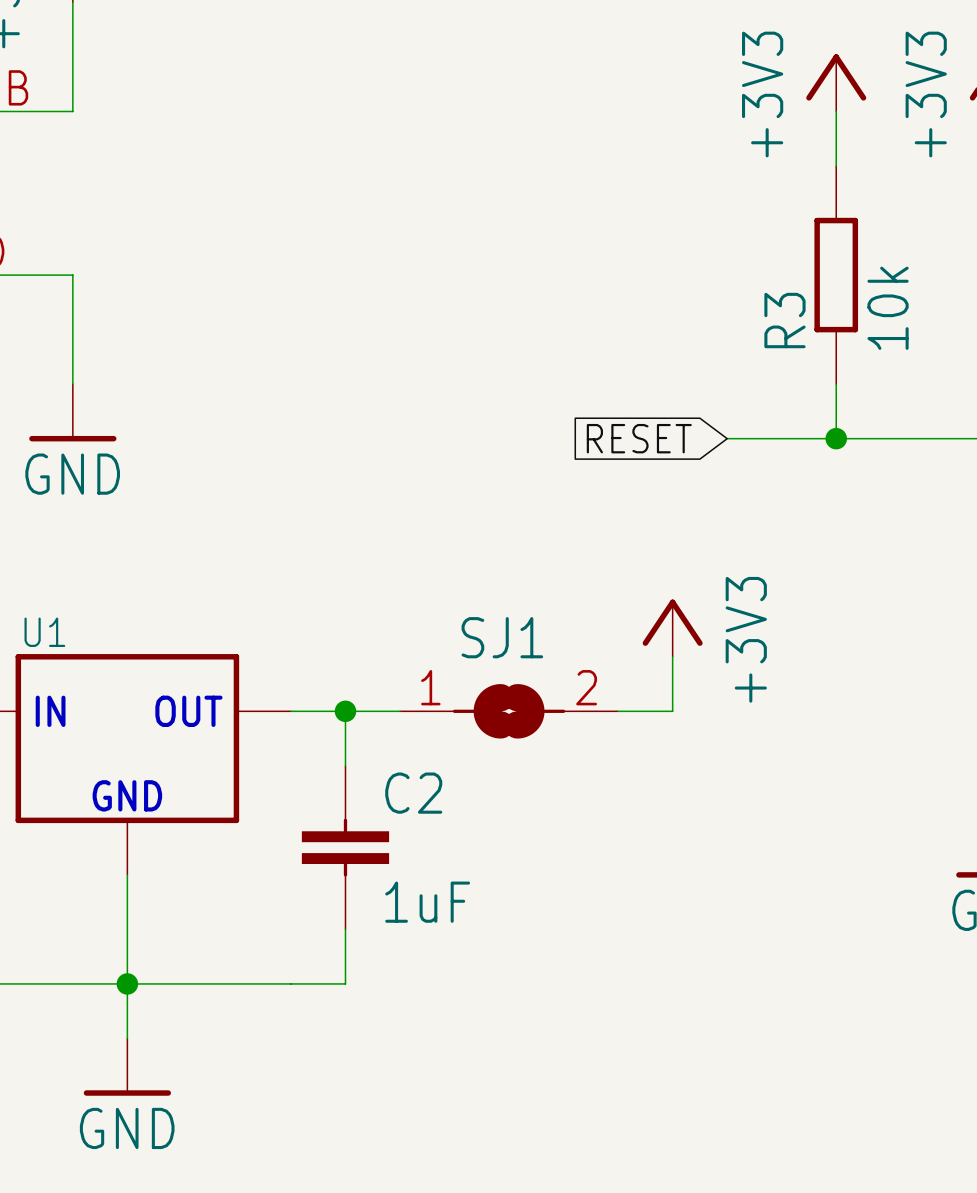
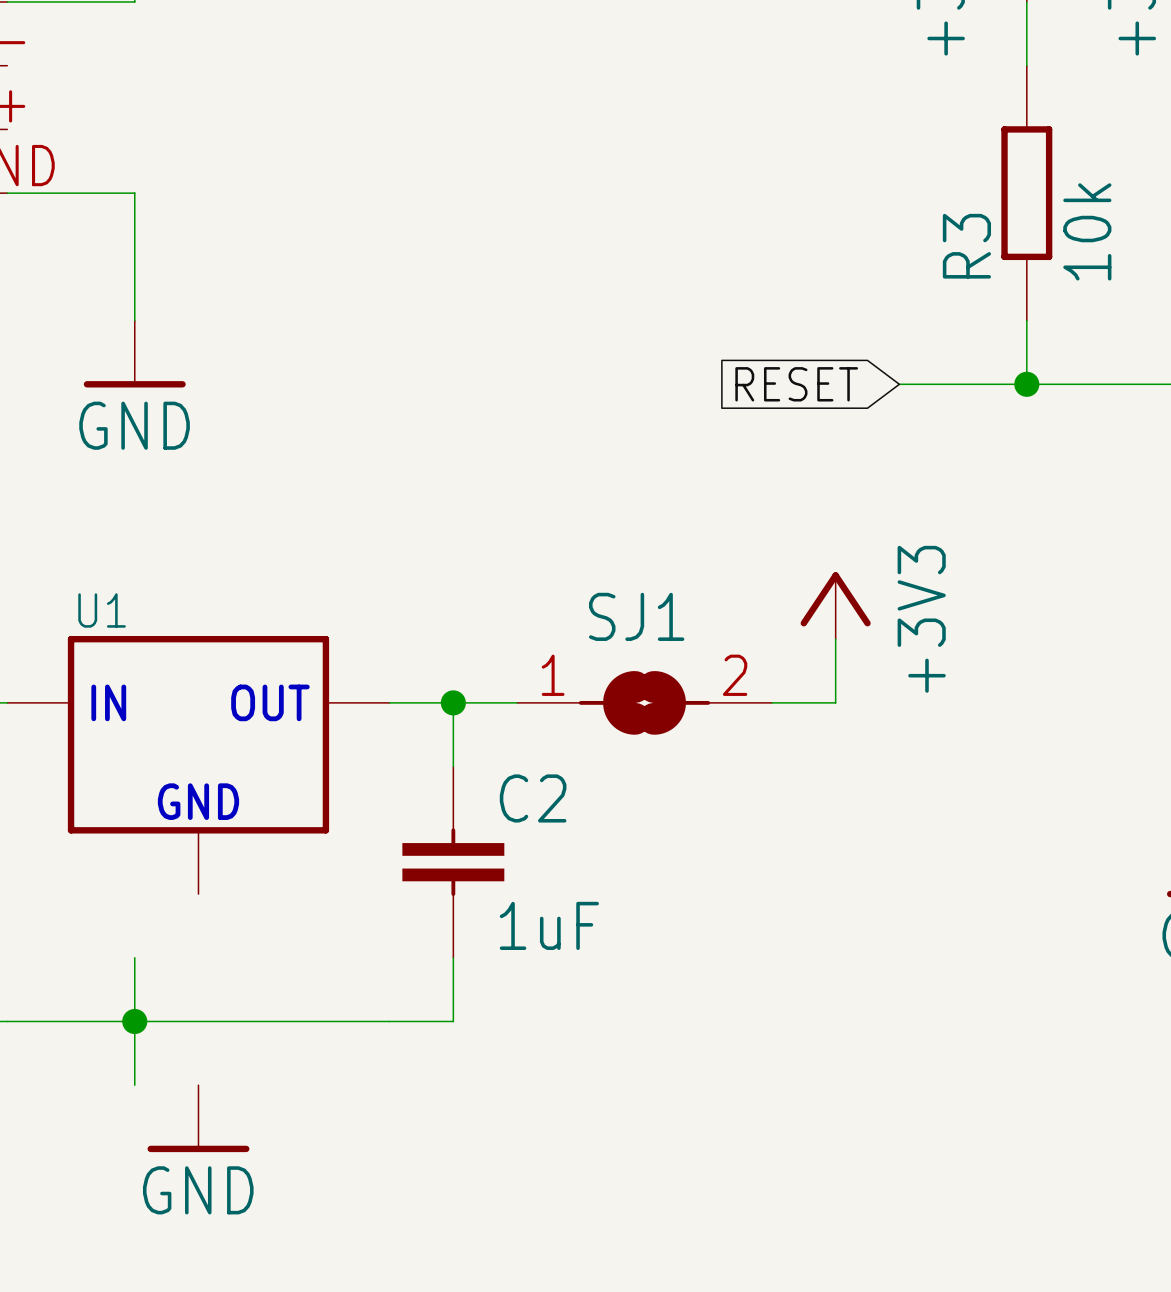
wire: (127, 874) (127, 1038) -> none
wire: none -> (134, 957) (134, 1085)
junction position: (127, 983) -> (134, 1021)

